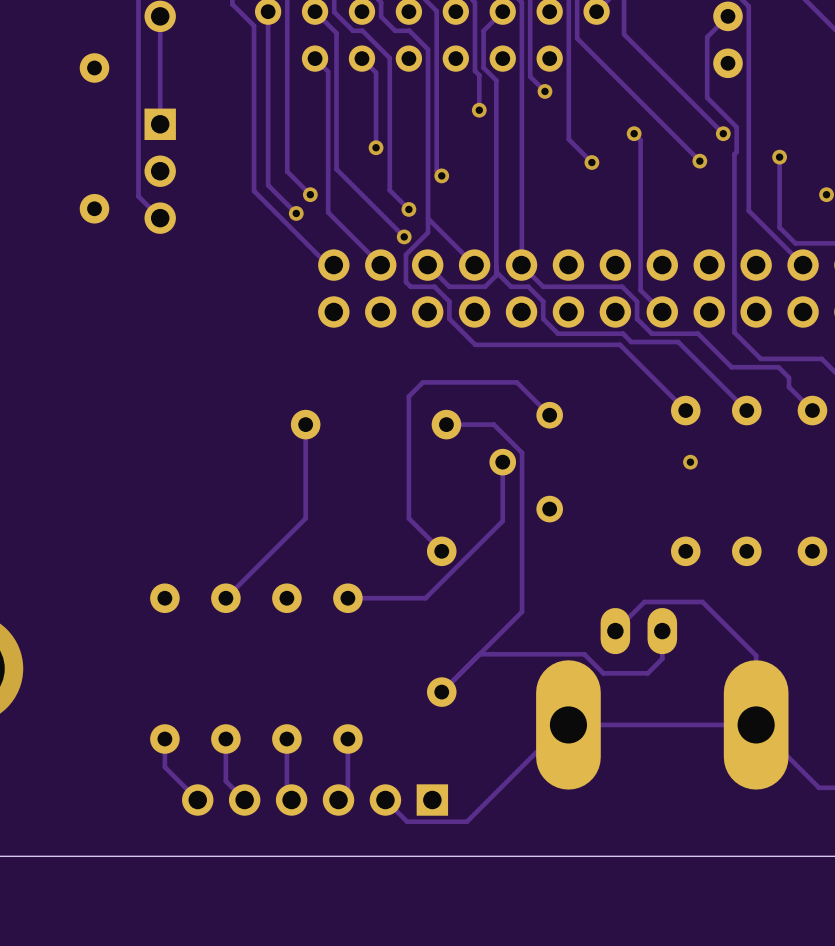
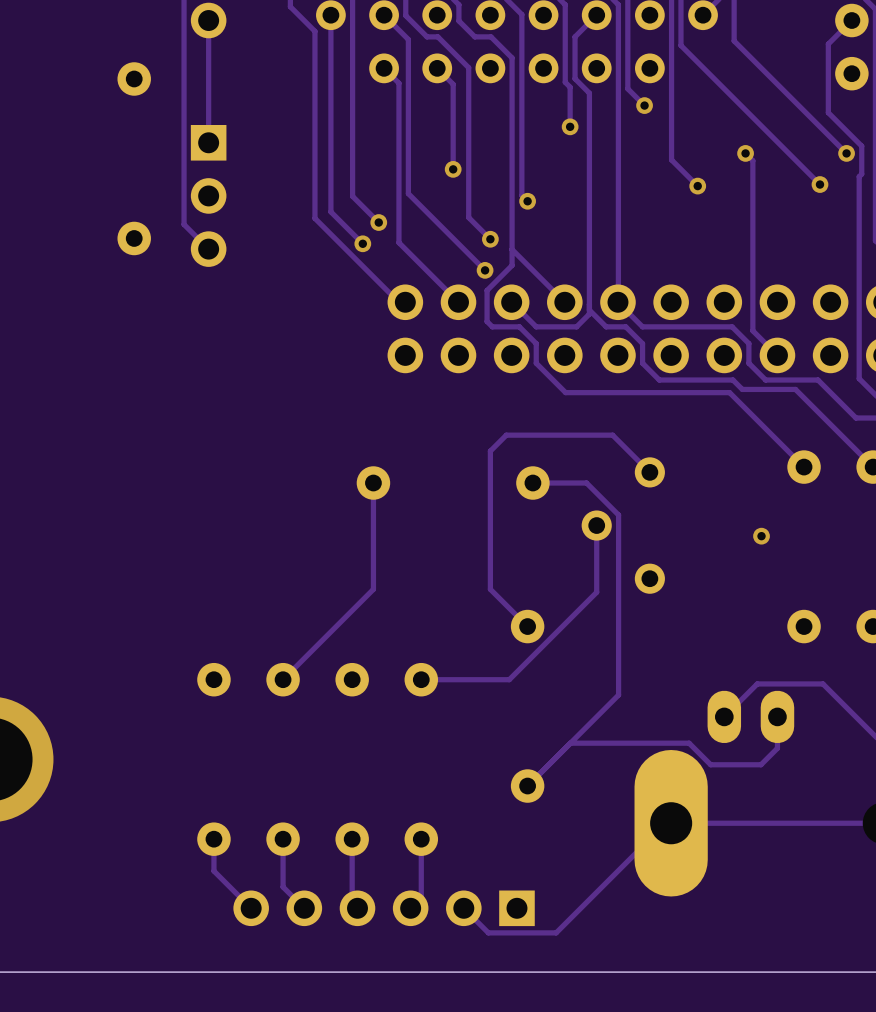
via position: (690, 462) -> (761, 536)

